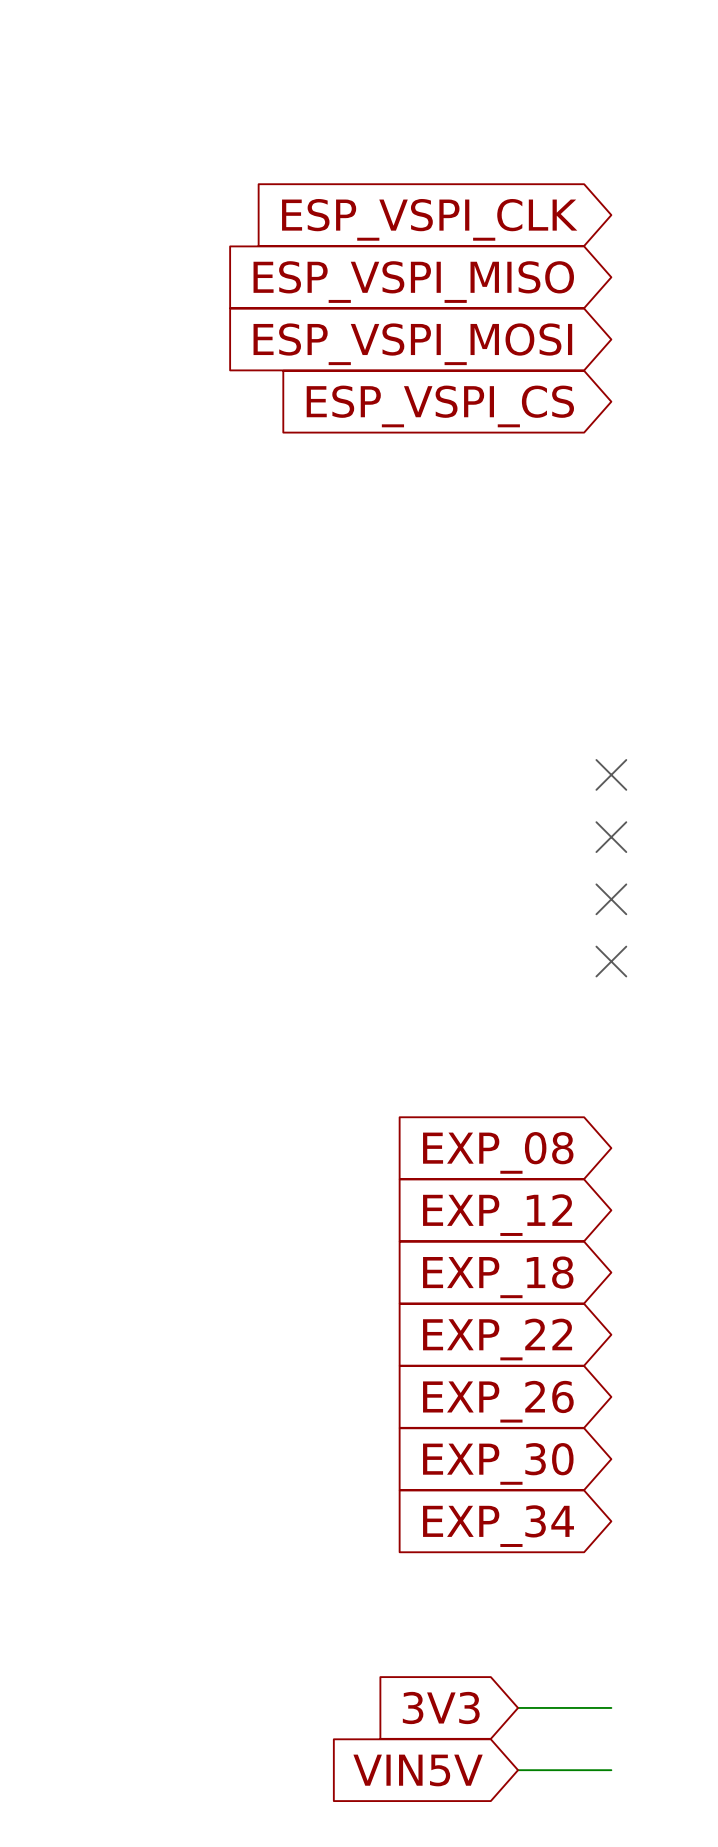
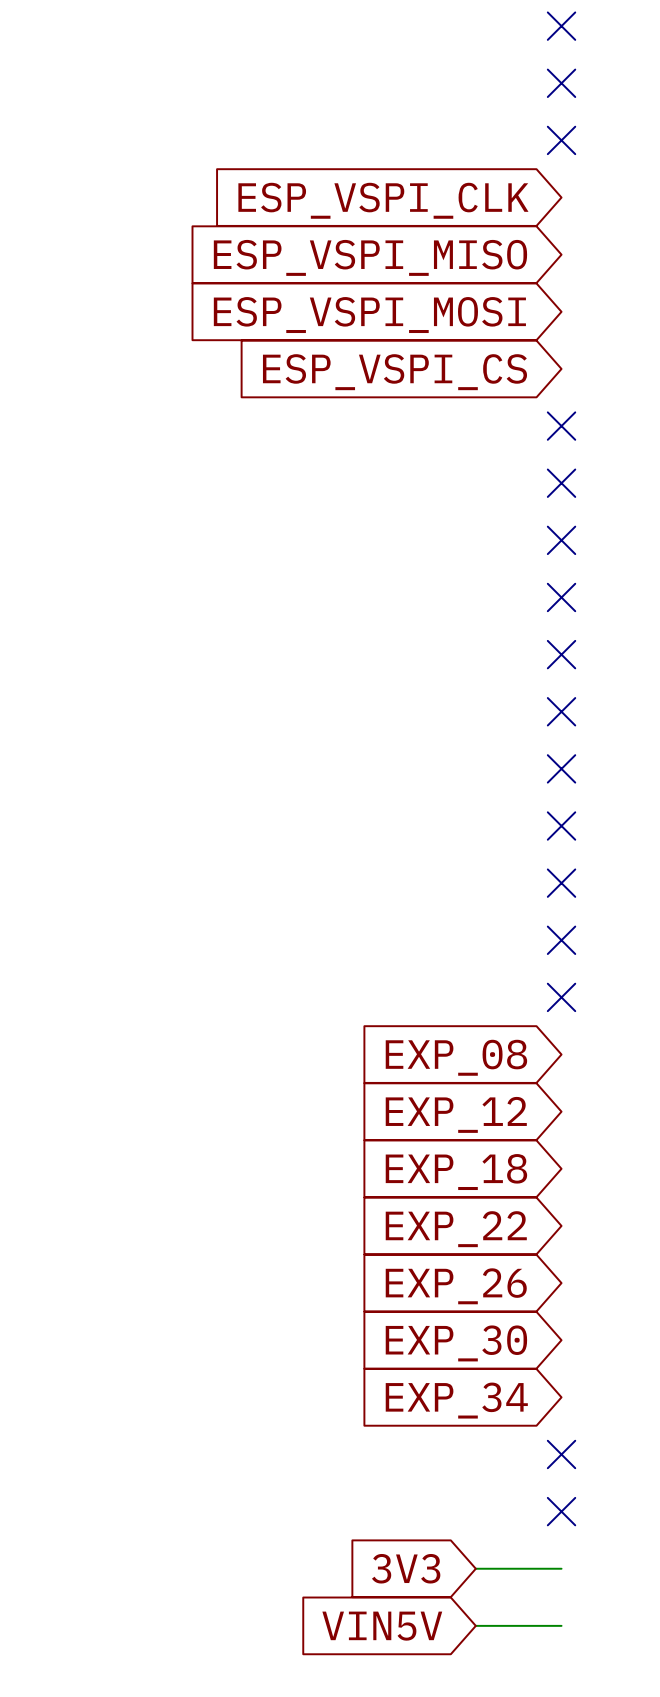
no-connect mark: none -> (561, 26)
no-connect mark: none -> (561, 83)
no-connect mark: none -> (561, 140)
no-connect mark: none -> (561, 426)
no-connect mark: none -> (561, 483)
no-connect mark: none -> (561, 540)
no-connect mark: none -> (561, 597)
no-connect mark: none -> (561, 654)
no-connect mark: none -> (561, 940)
no-connect mark: none -> (561, 997)
no-connect mark: none -> (561, 1454)
no-connect mark: none -> (561, 1511)

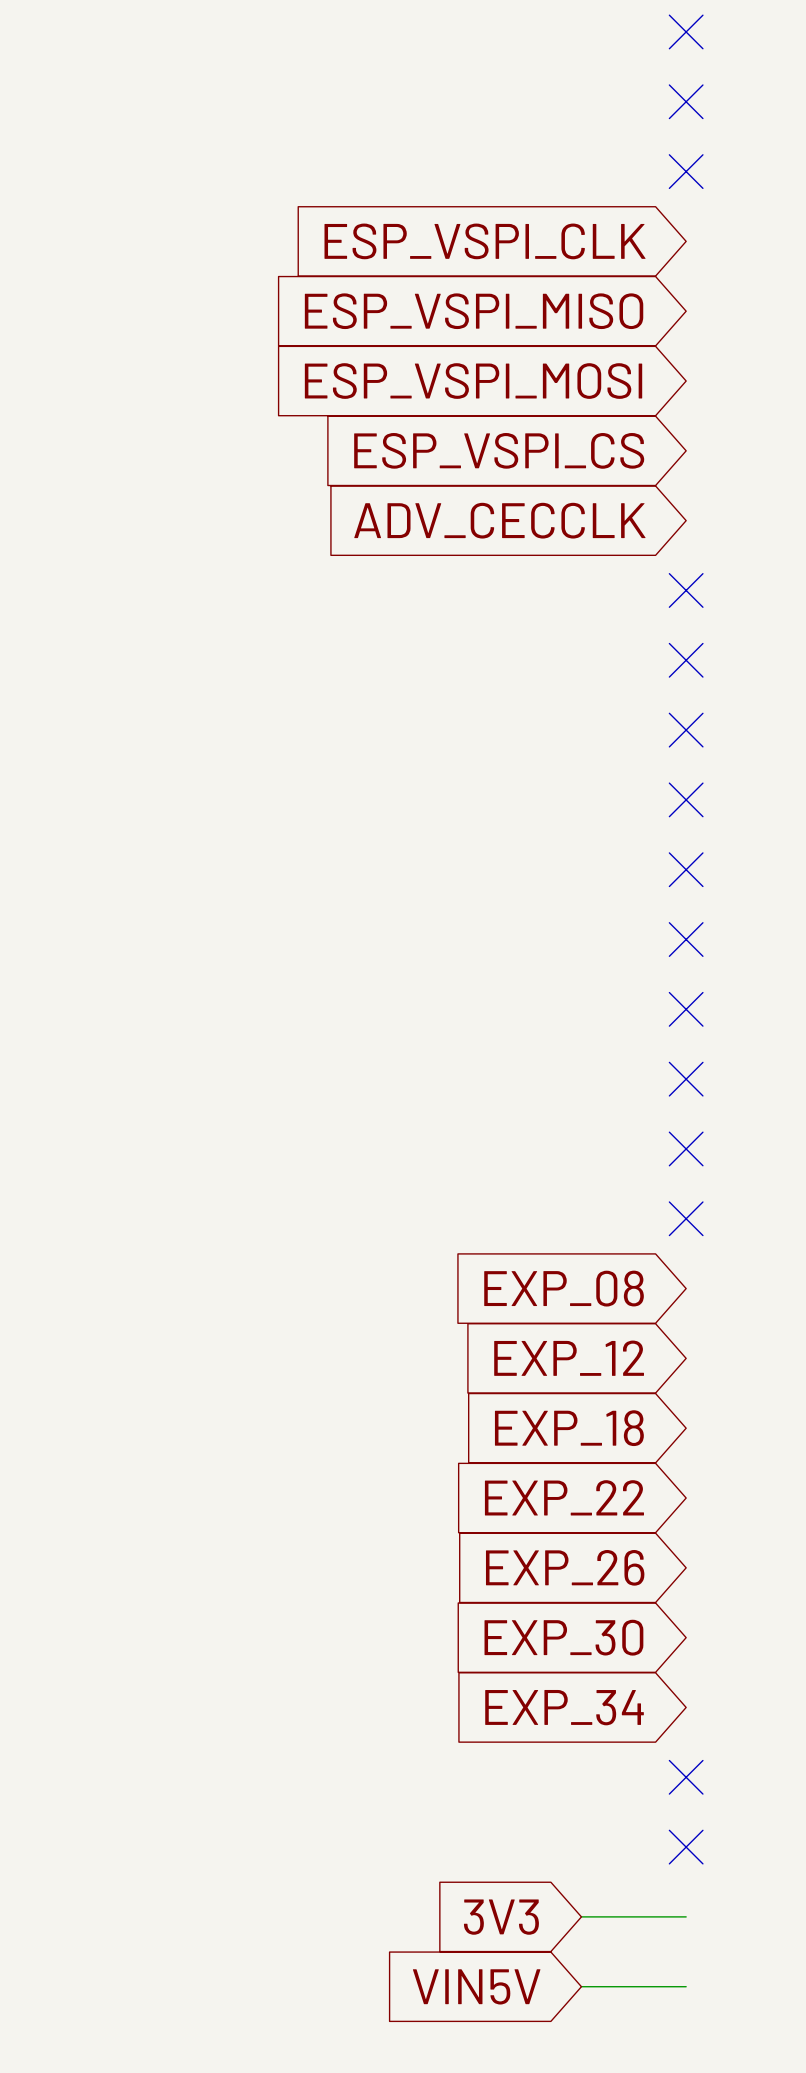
no-connect mark: (561, 426) -> none
global label: none -> ADV_CECCLK (499, 520)

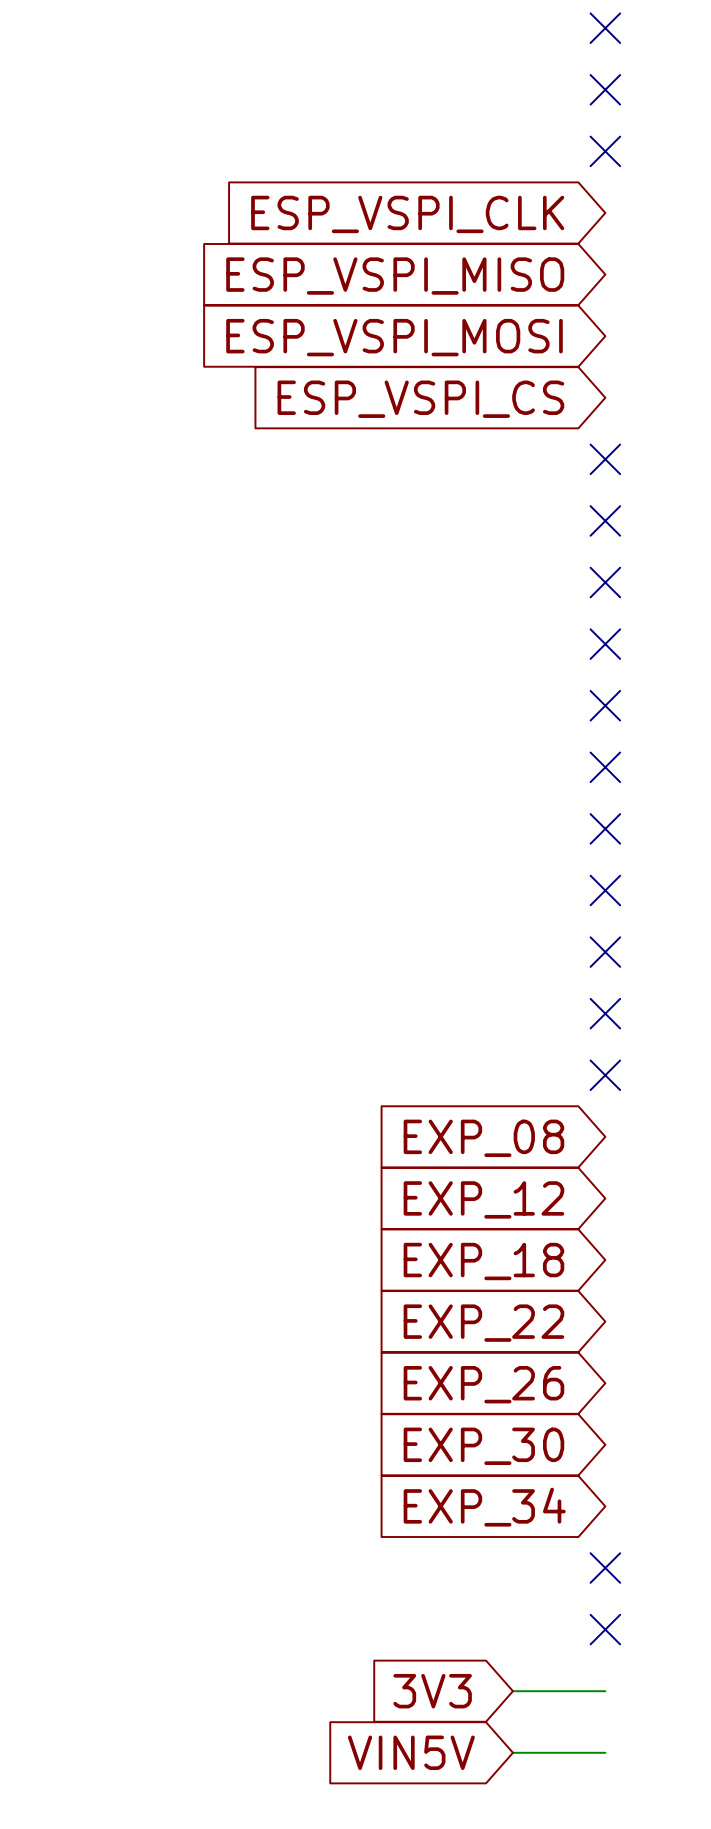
global label: ADV_CECCLK (499, 520) -> none
no-connect mark: none -> (605, 459)

